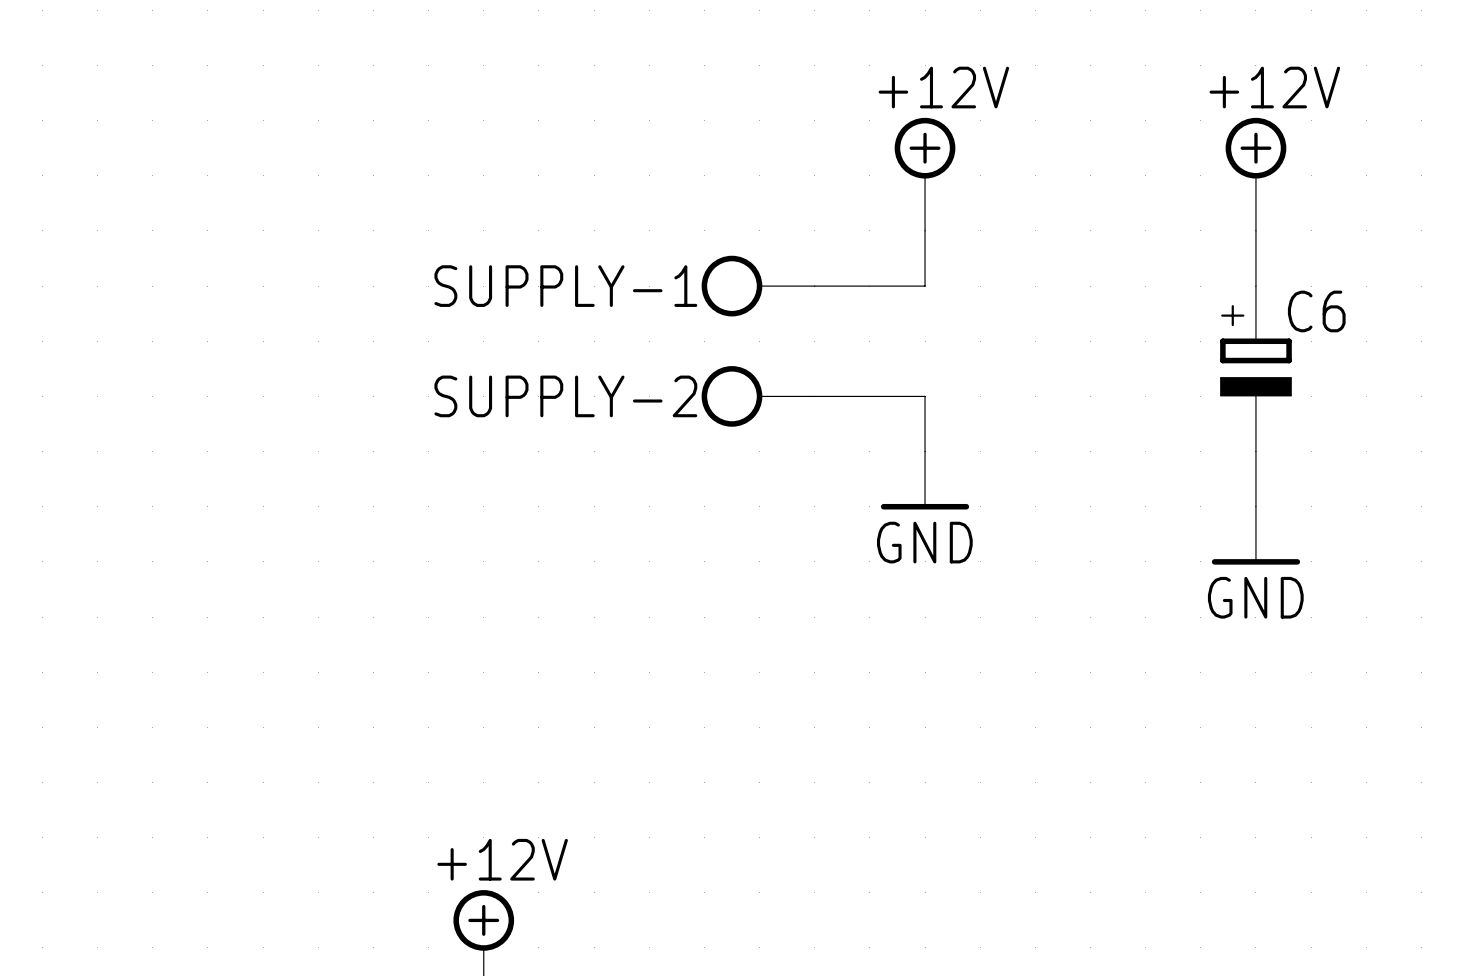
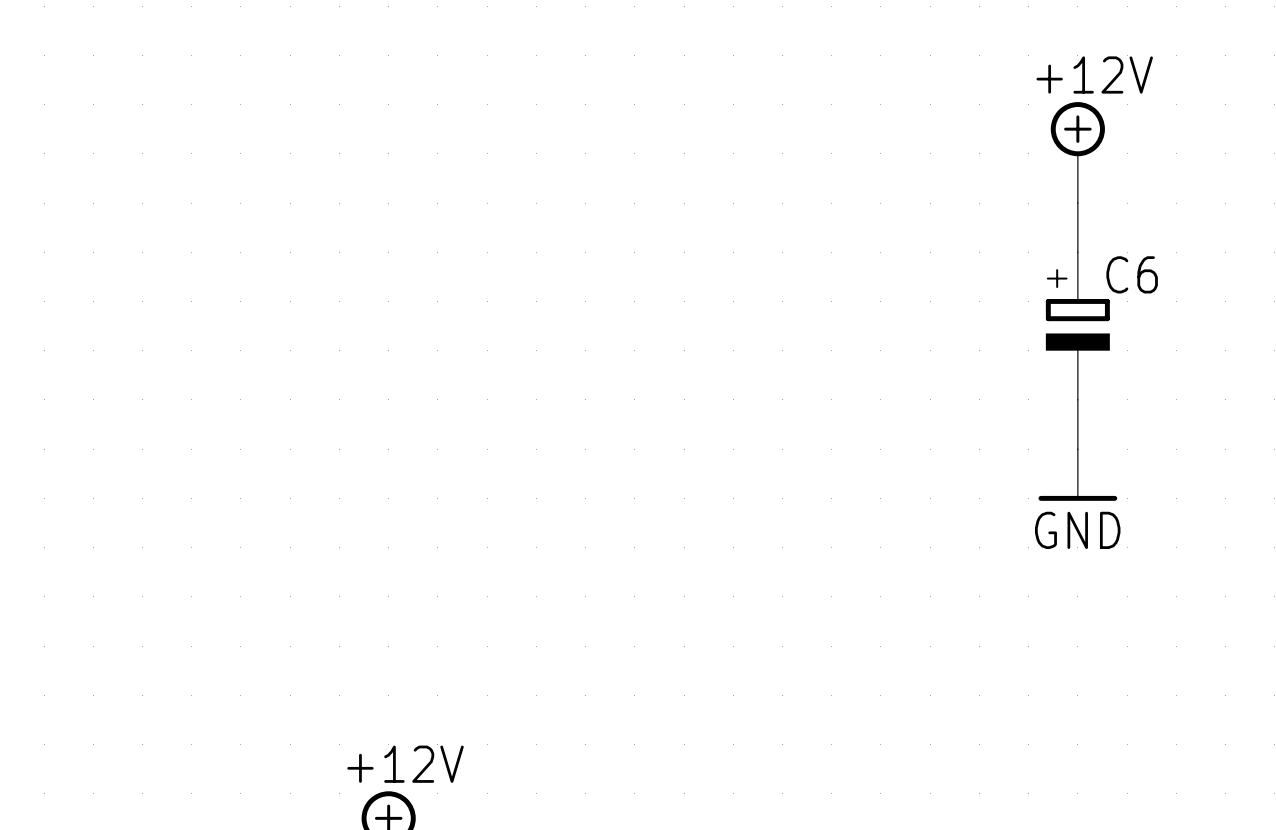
power symbol: +12V (925, 174) -> none
wire: (925, 230) (925, 286) (814, 286) -> none
SUPPLY-1: (758, 286) -> none
SUPPLY-2: (758, 396) -> none
wire: (814, 396) (925, 396) (925, 451) -> none
power symbol: GND (925, 480) -> none

